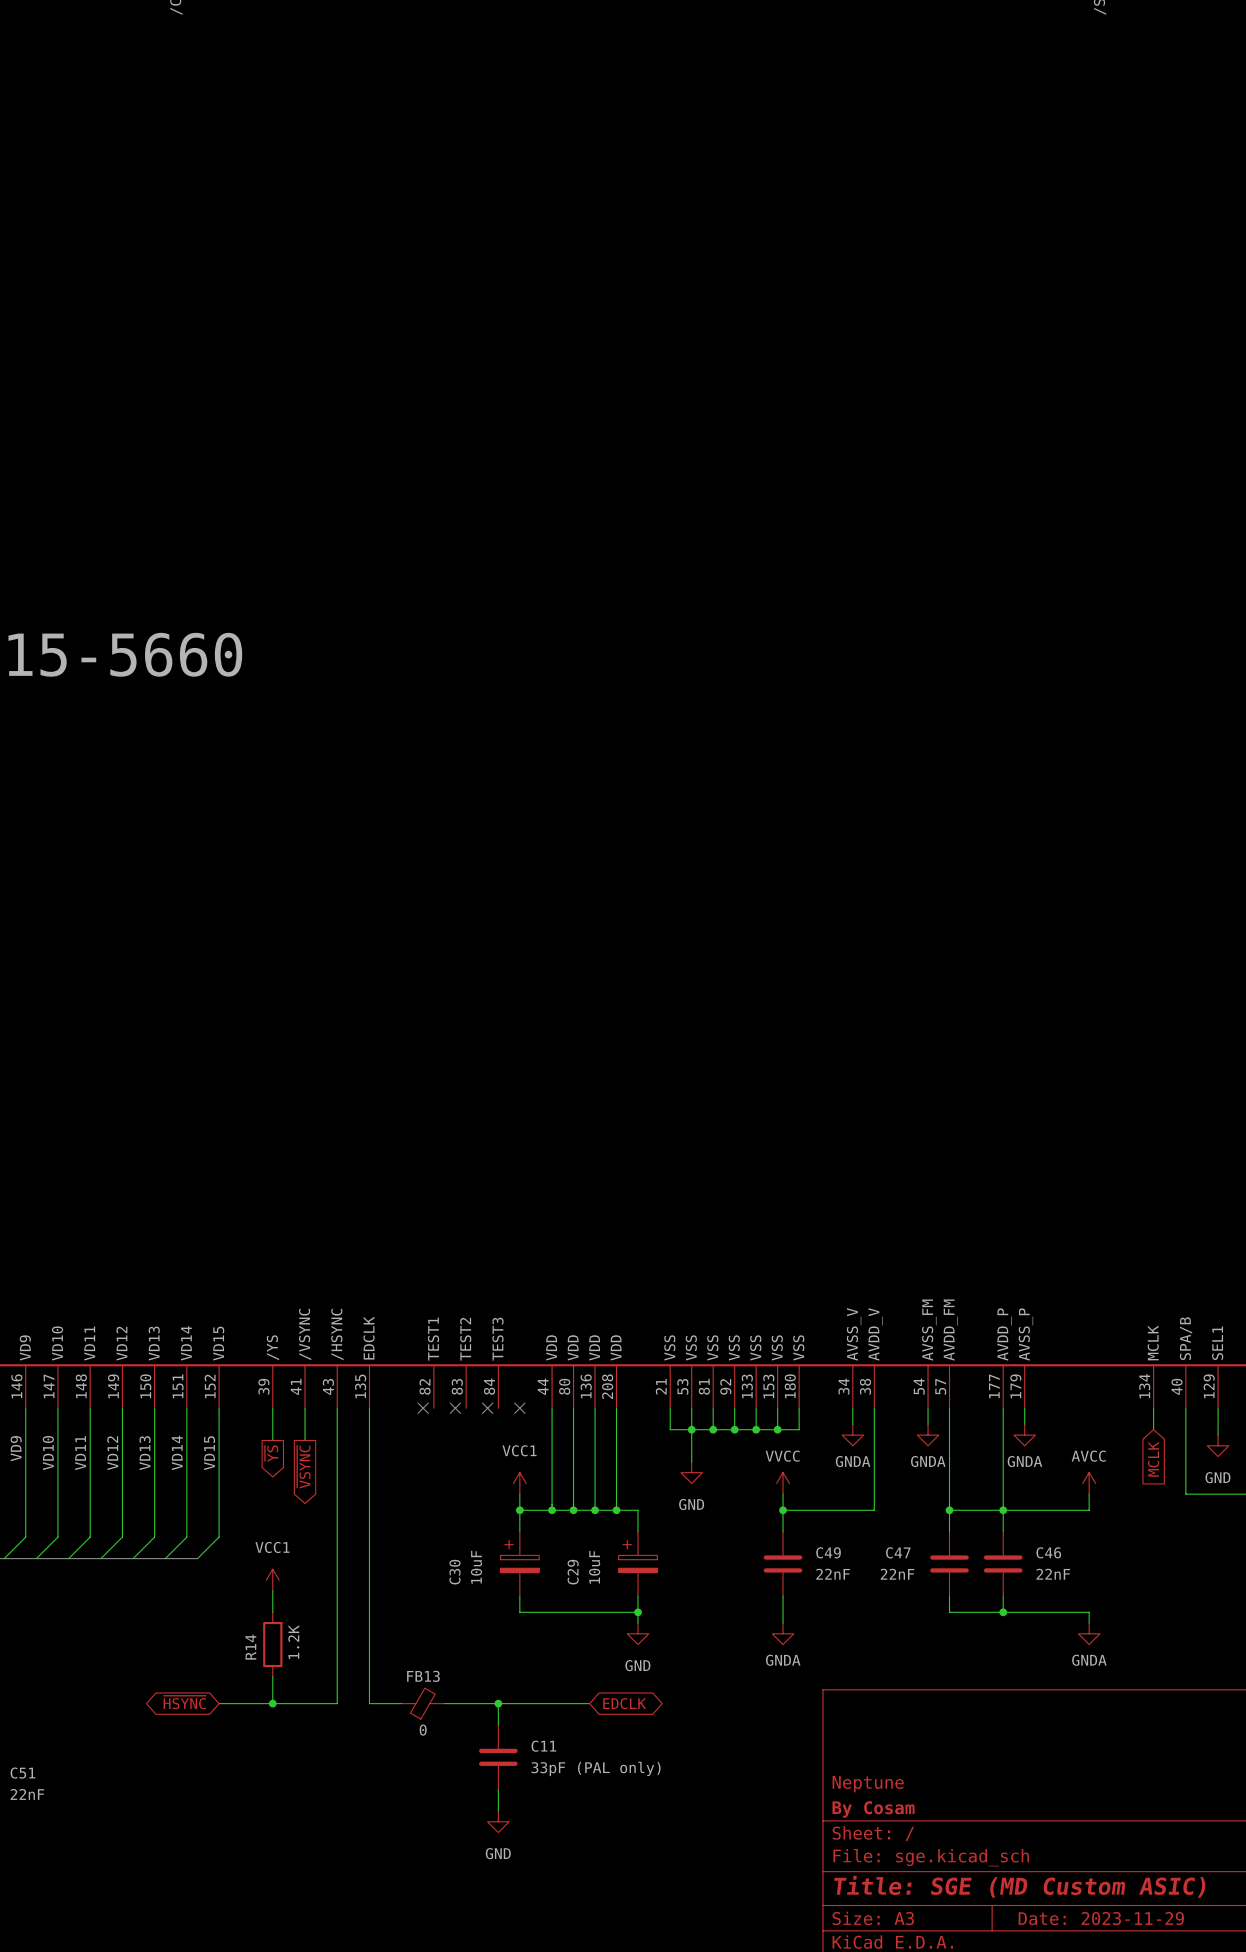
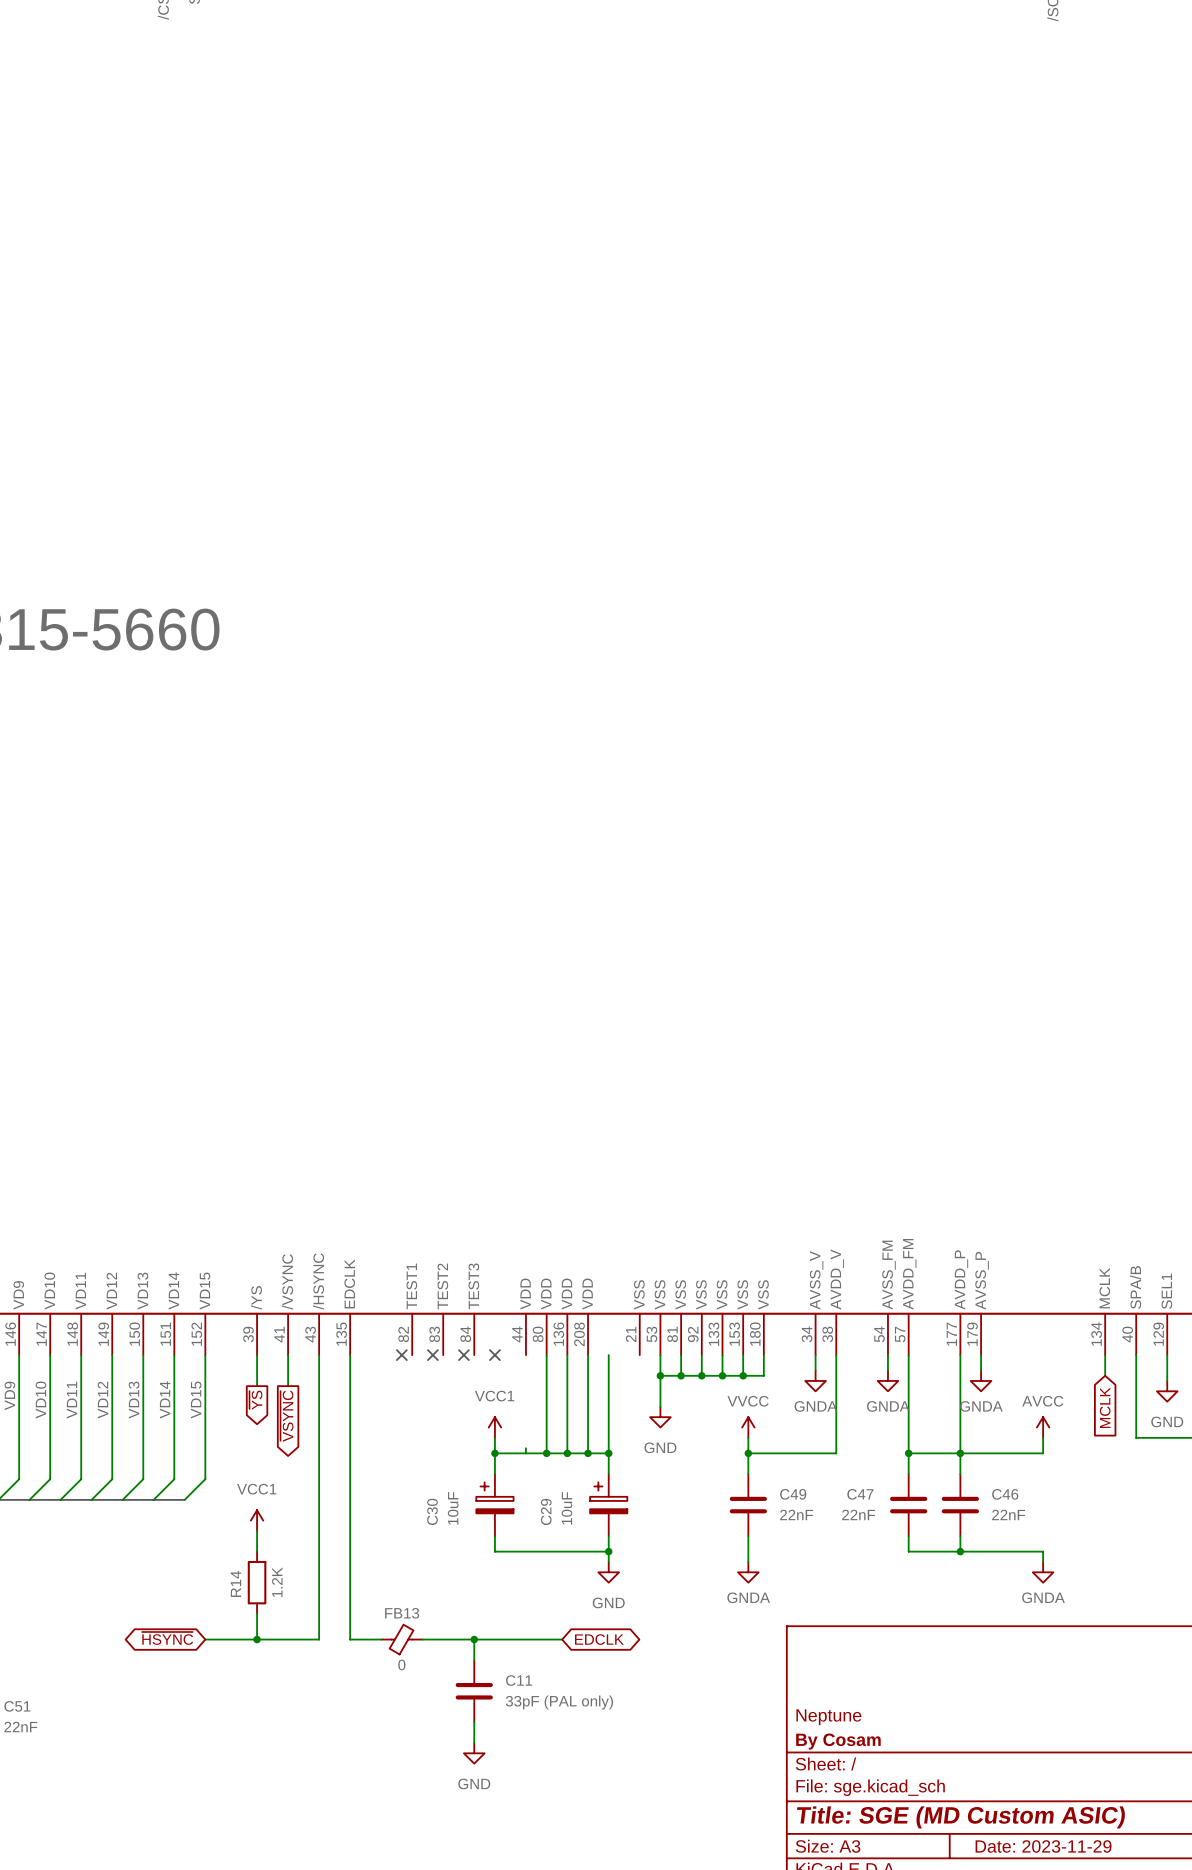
wire: (552, 1408) (552, 1504) -> none
wire: none -> (608, 1355) (608, 1453)
wire: (670, 1408) (670, 1429) (691, 1429) -> none
junction: (552, 1510) -> none
junction: none -> (608, 1453)

